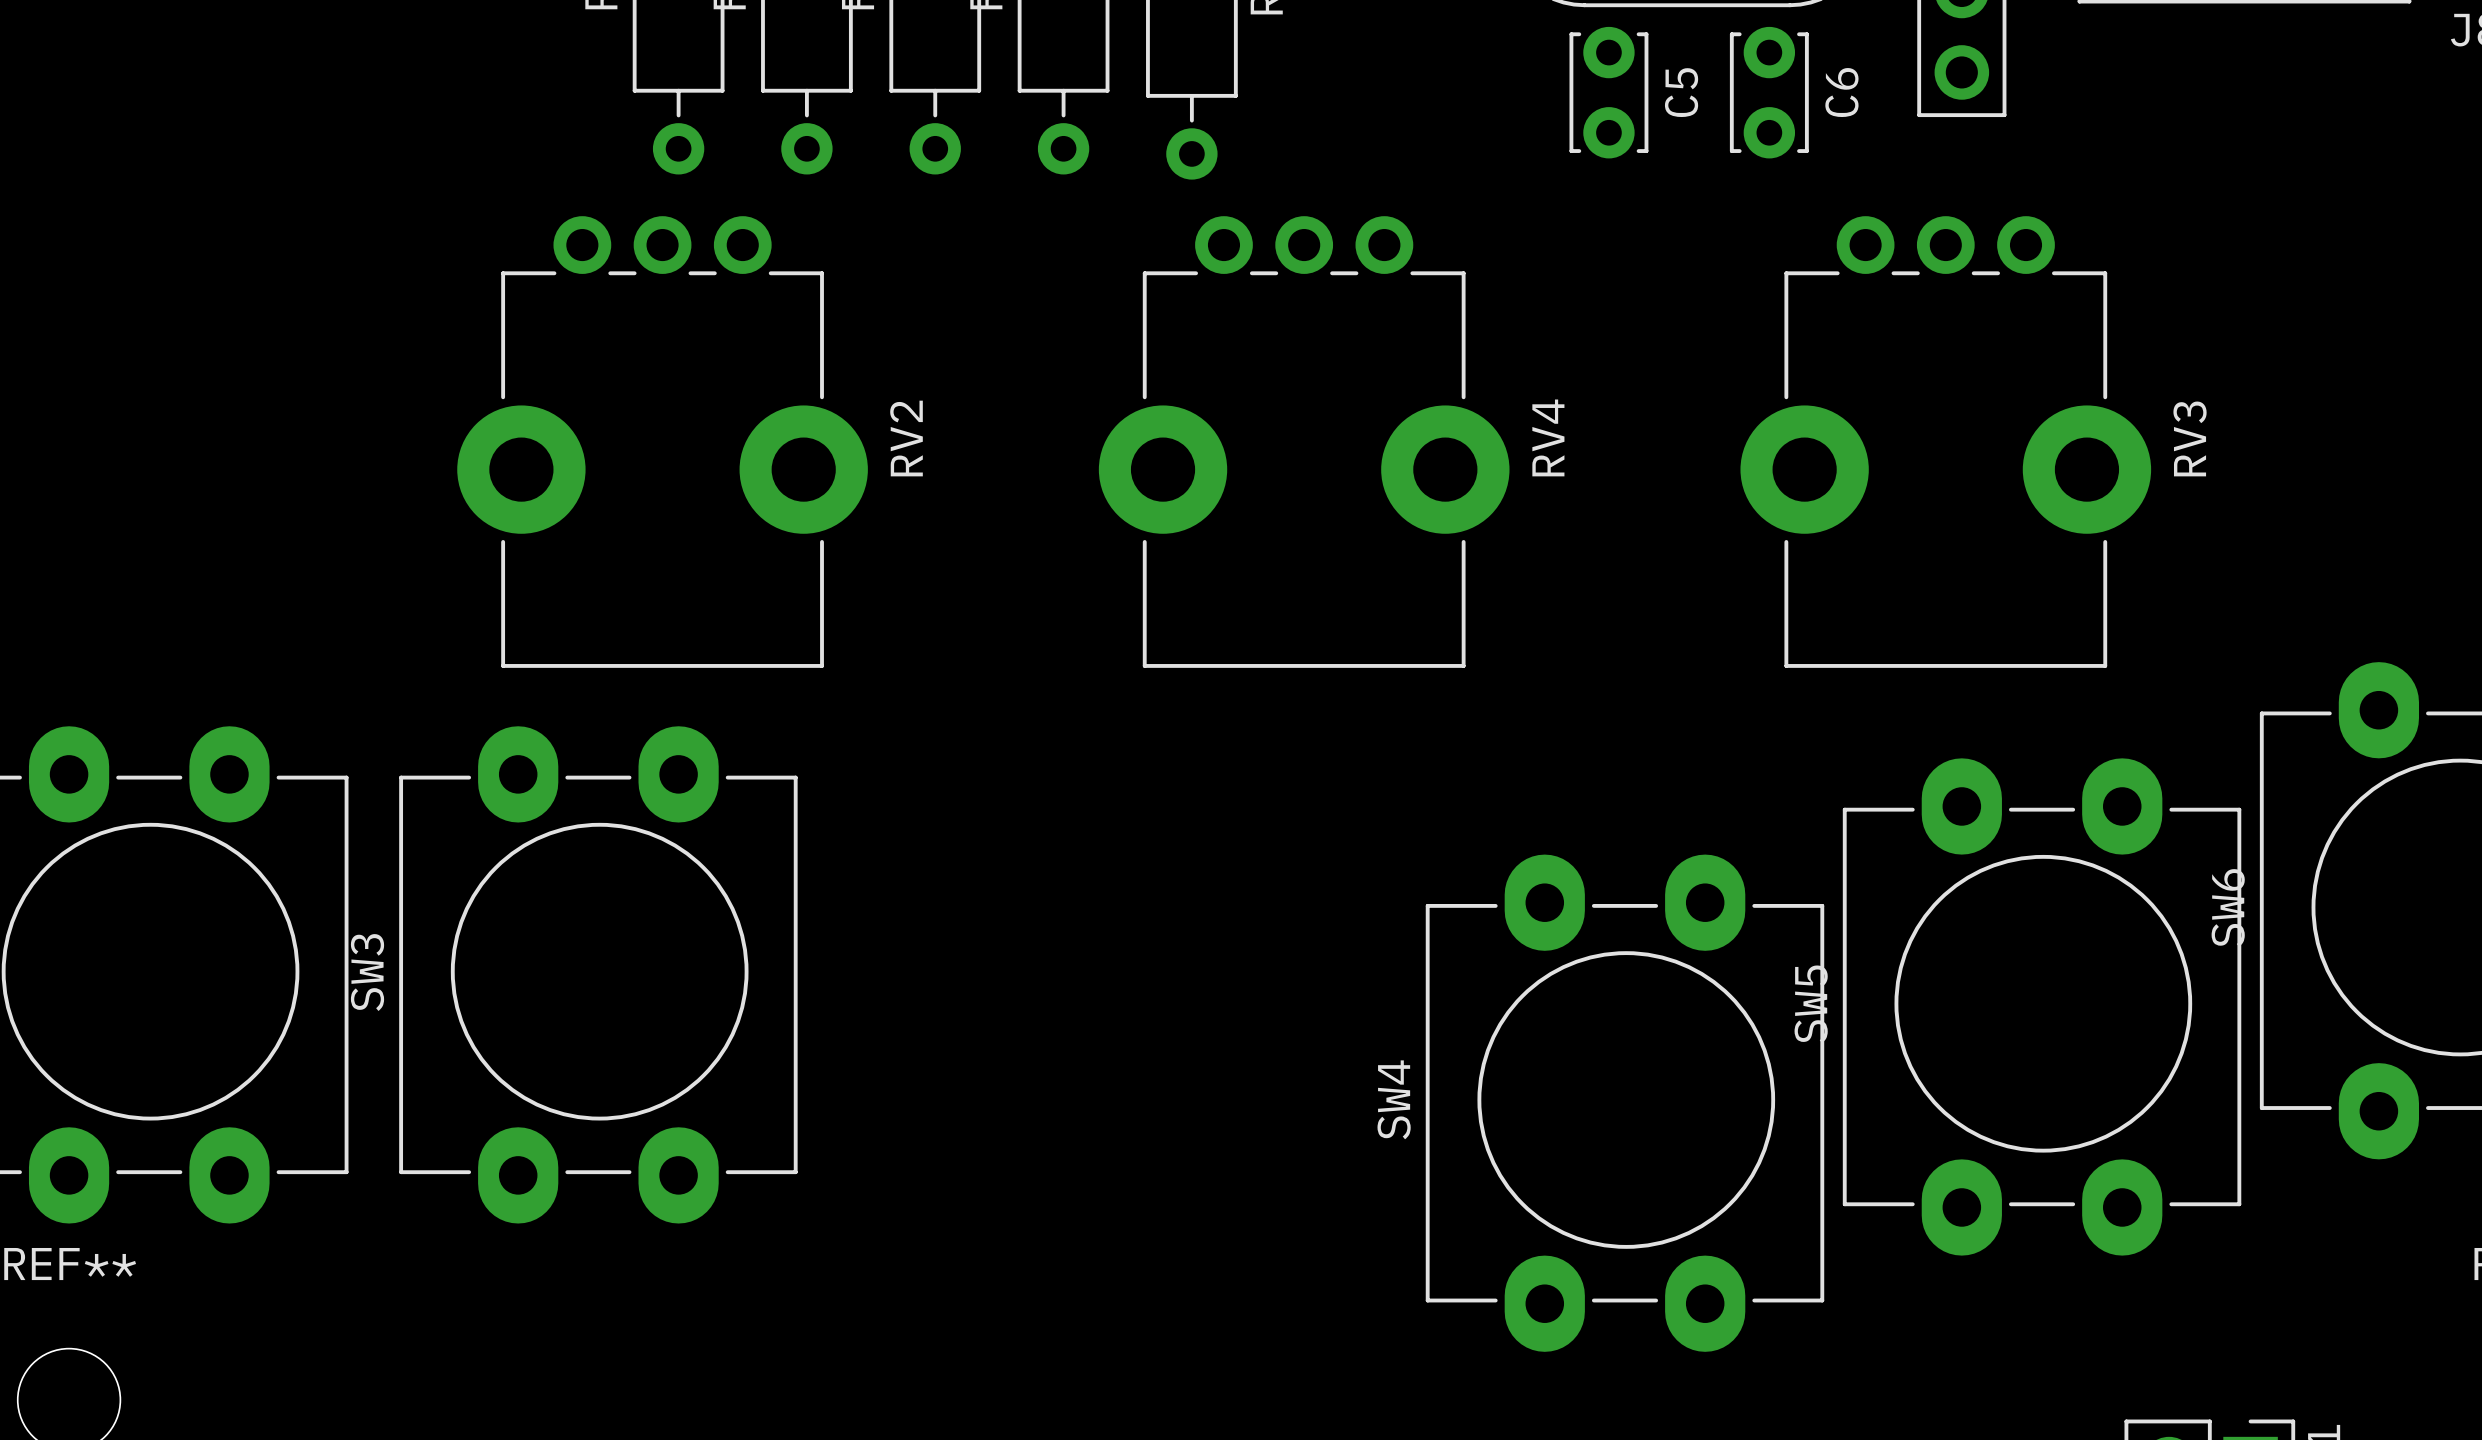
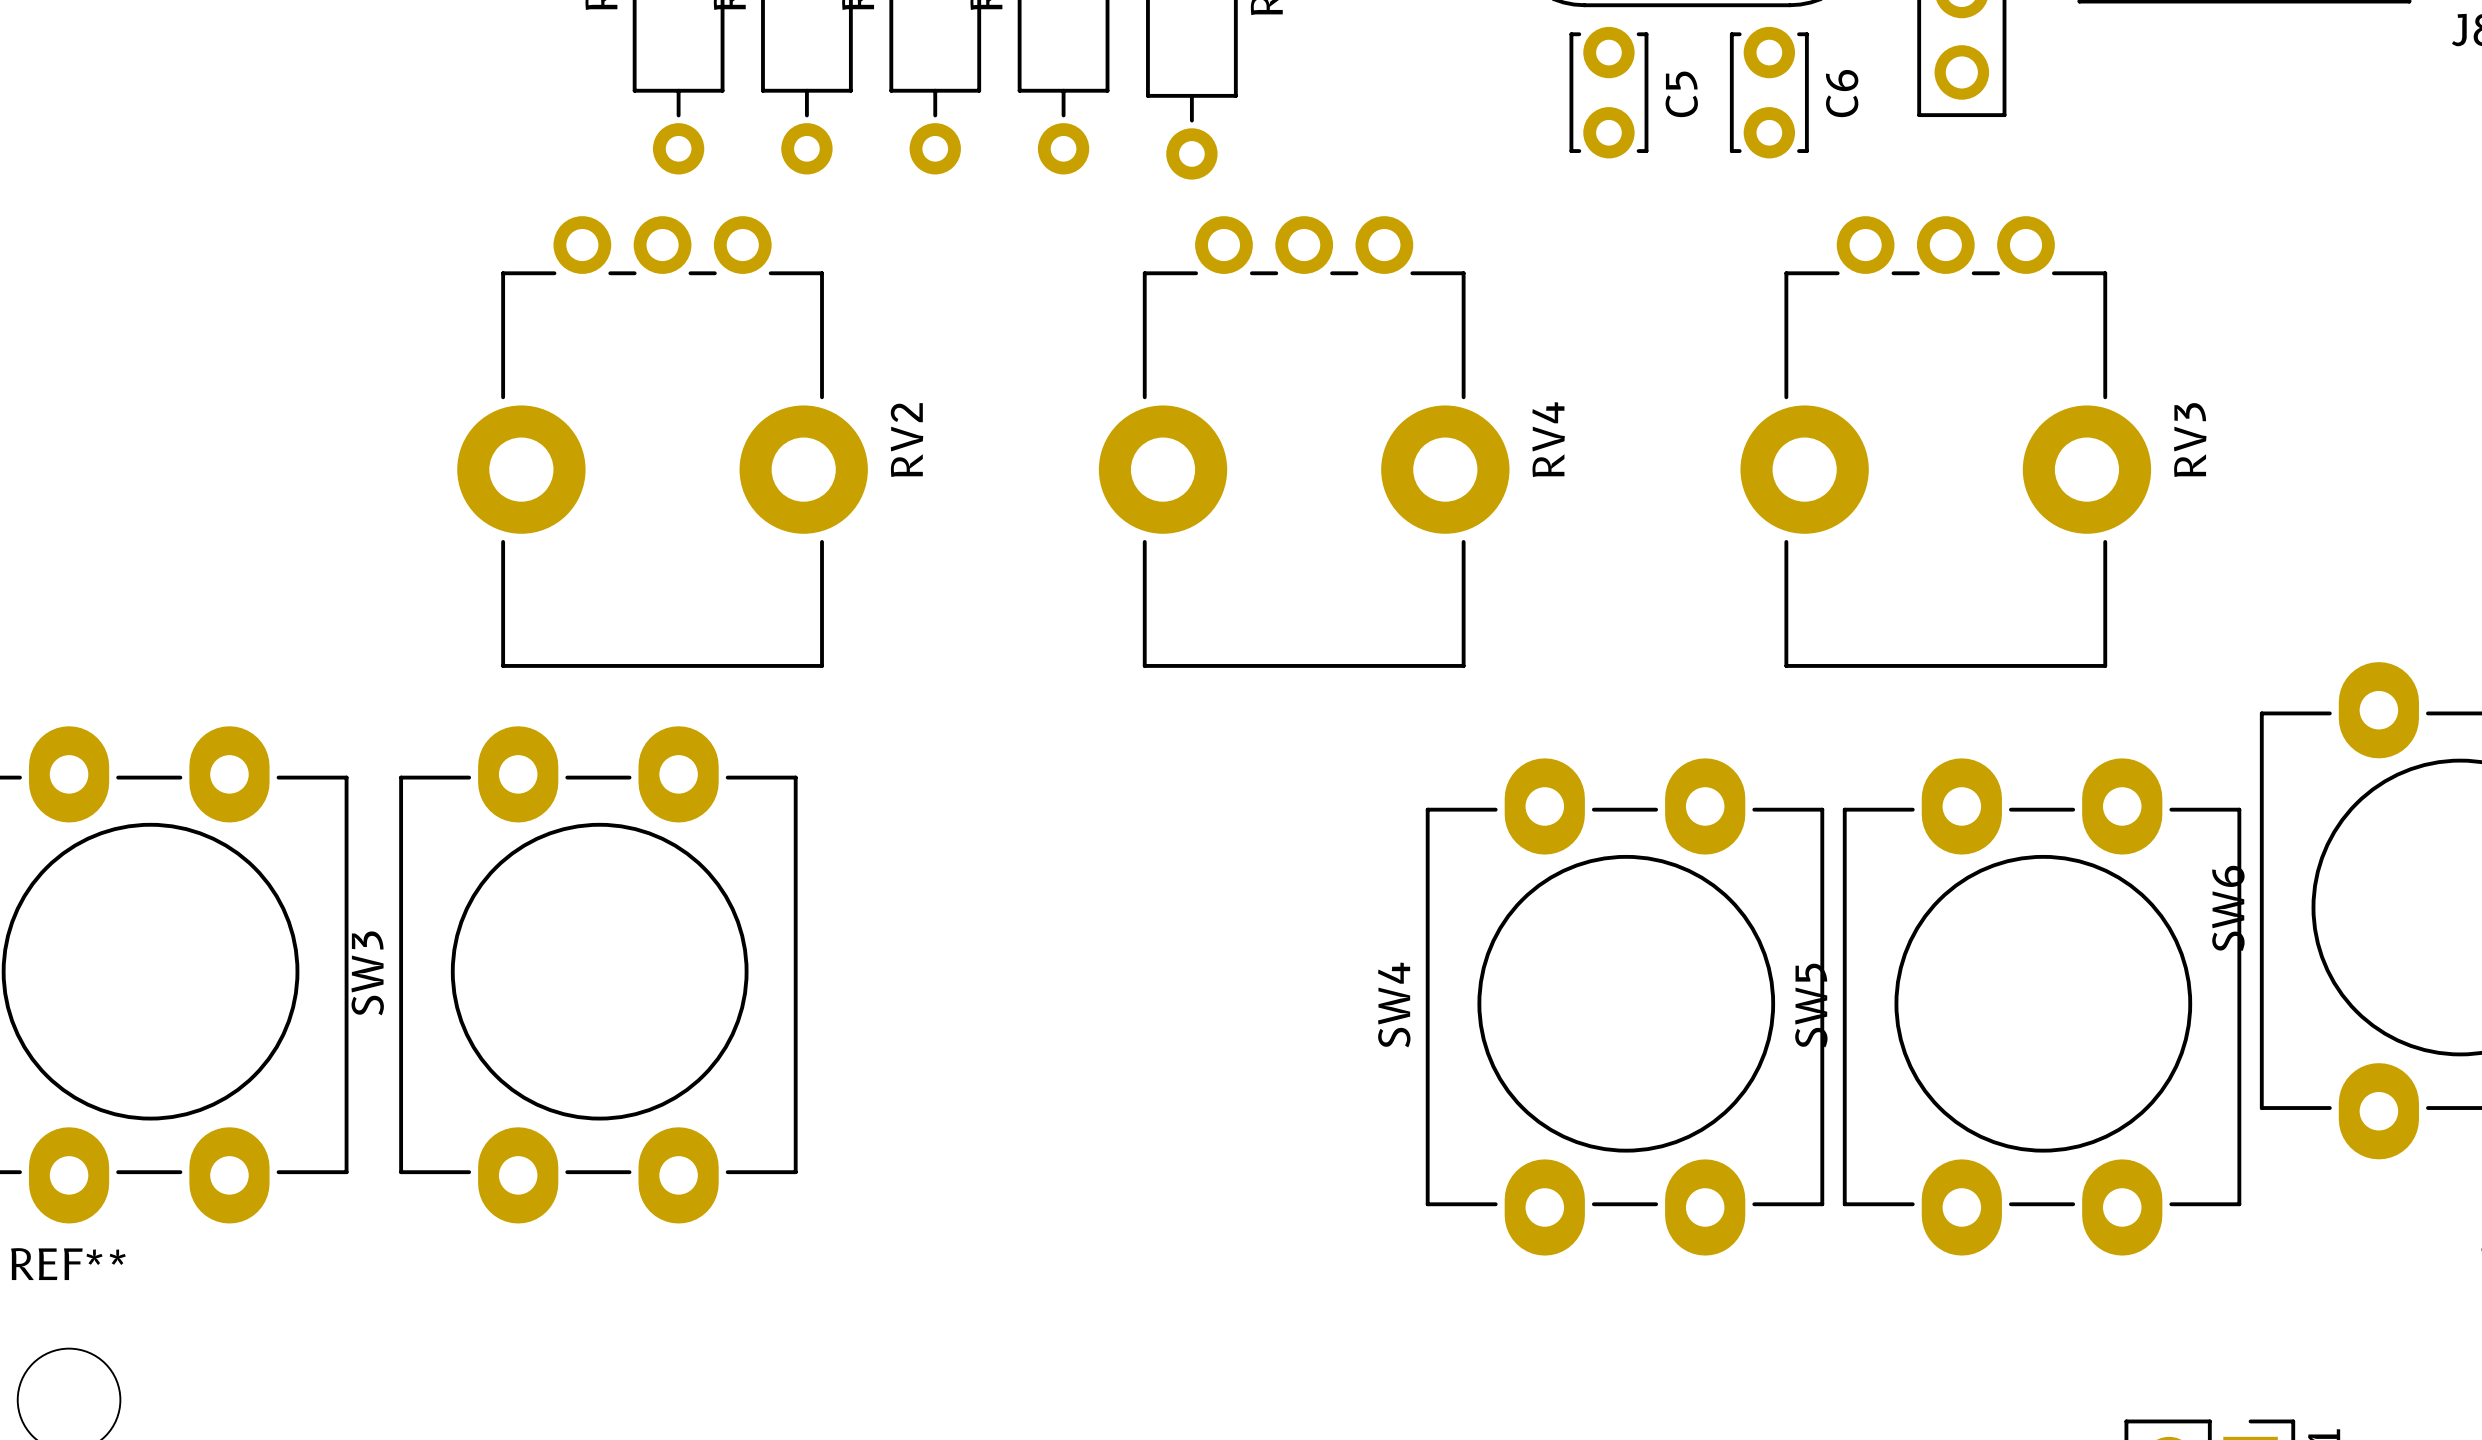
SW4 position: (1624, 1103) -> (1624, 1006)

